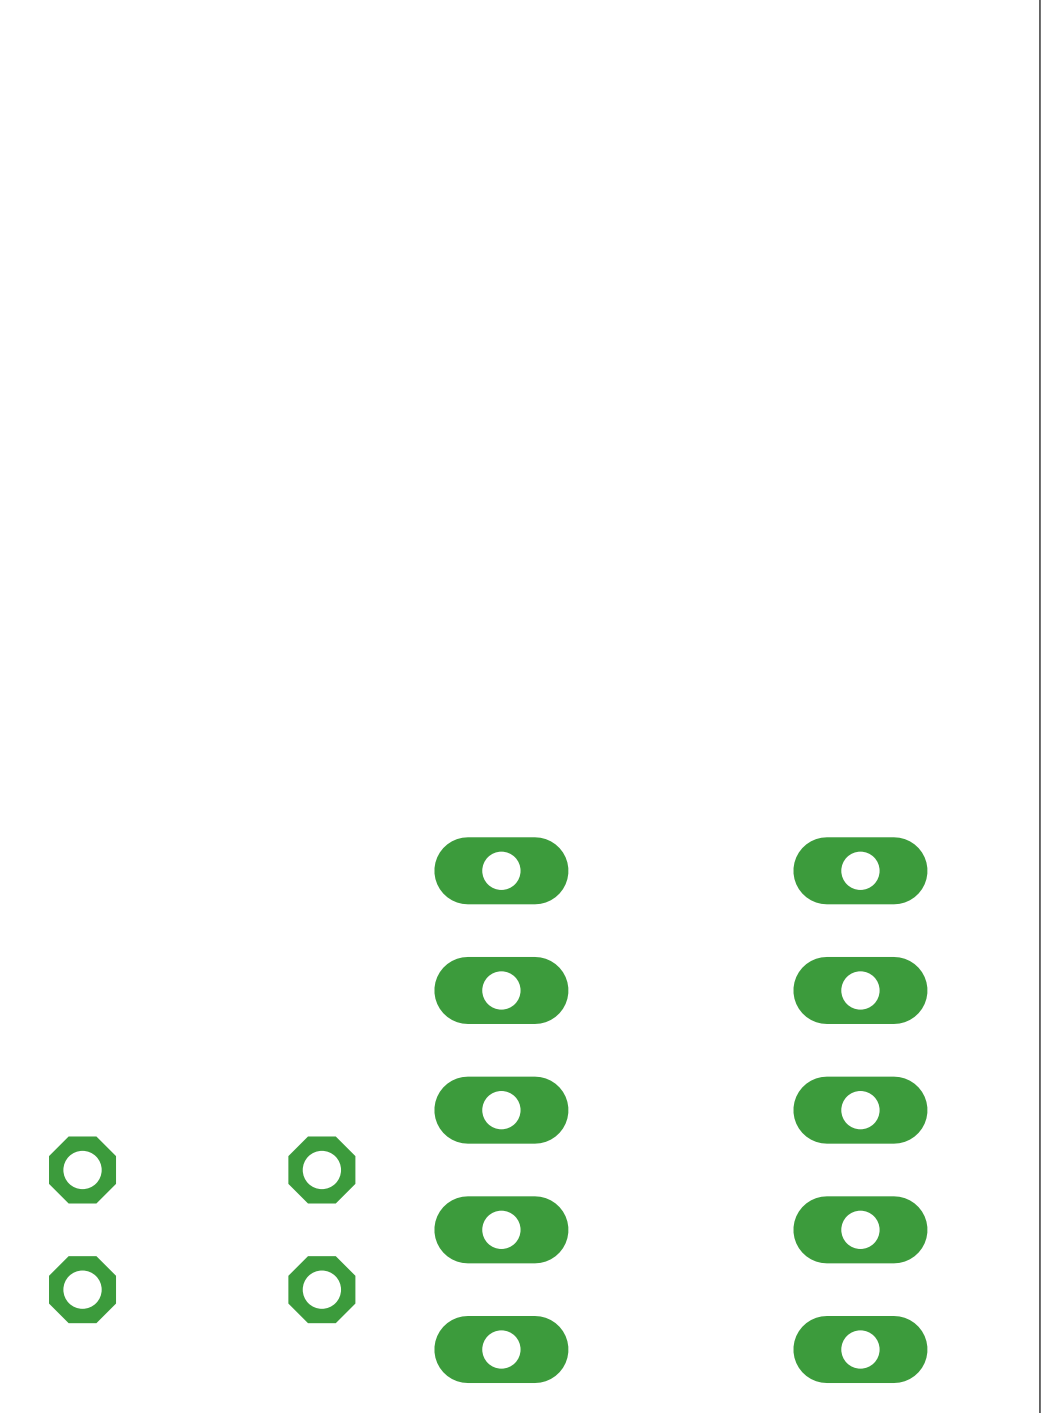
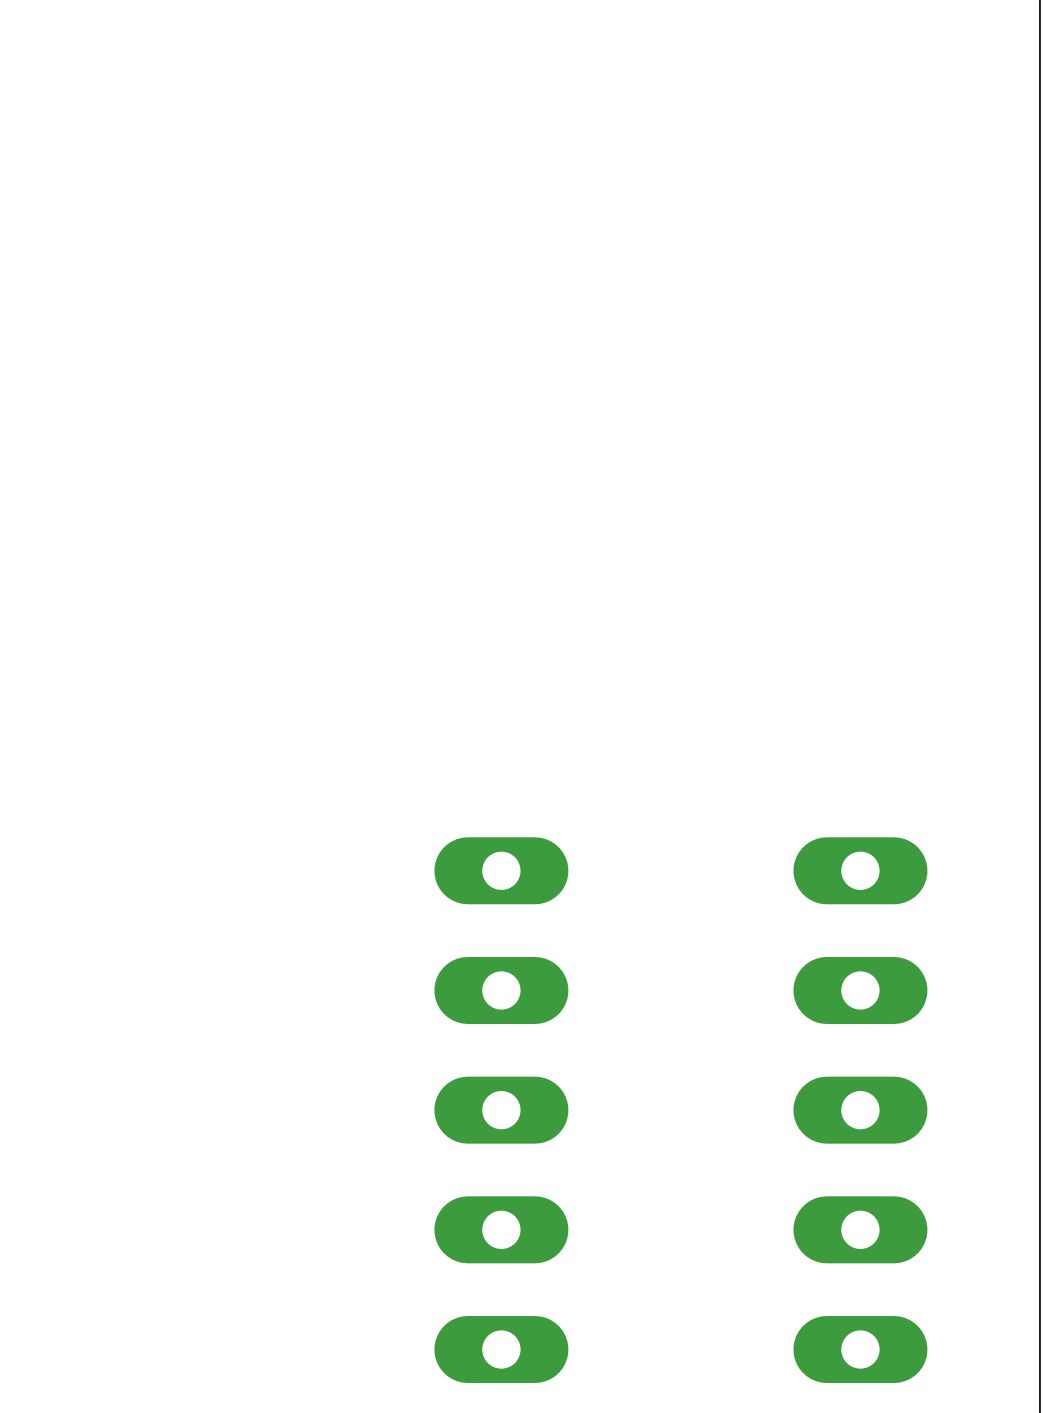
part: (82, 1229) -> none
part: (321, 1229) -> none

